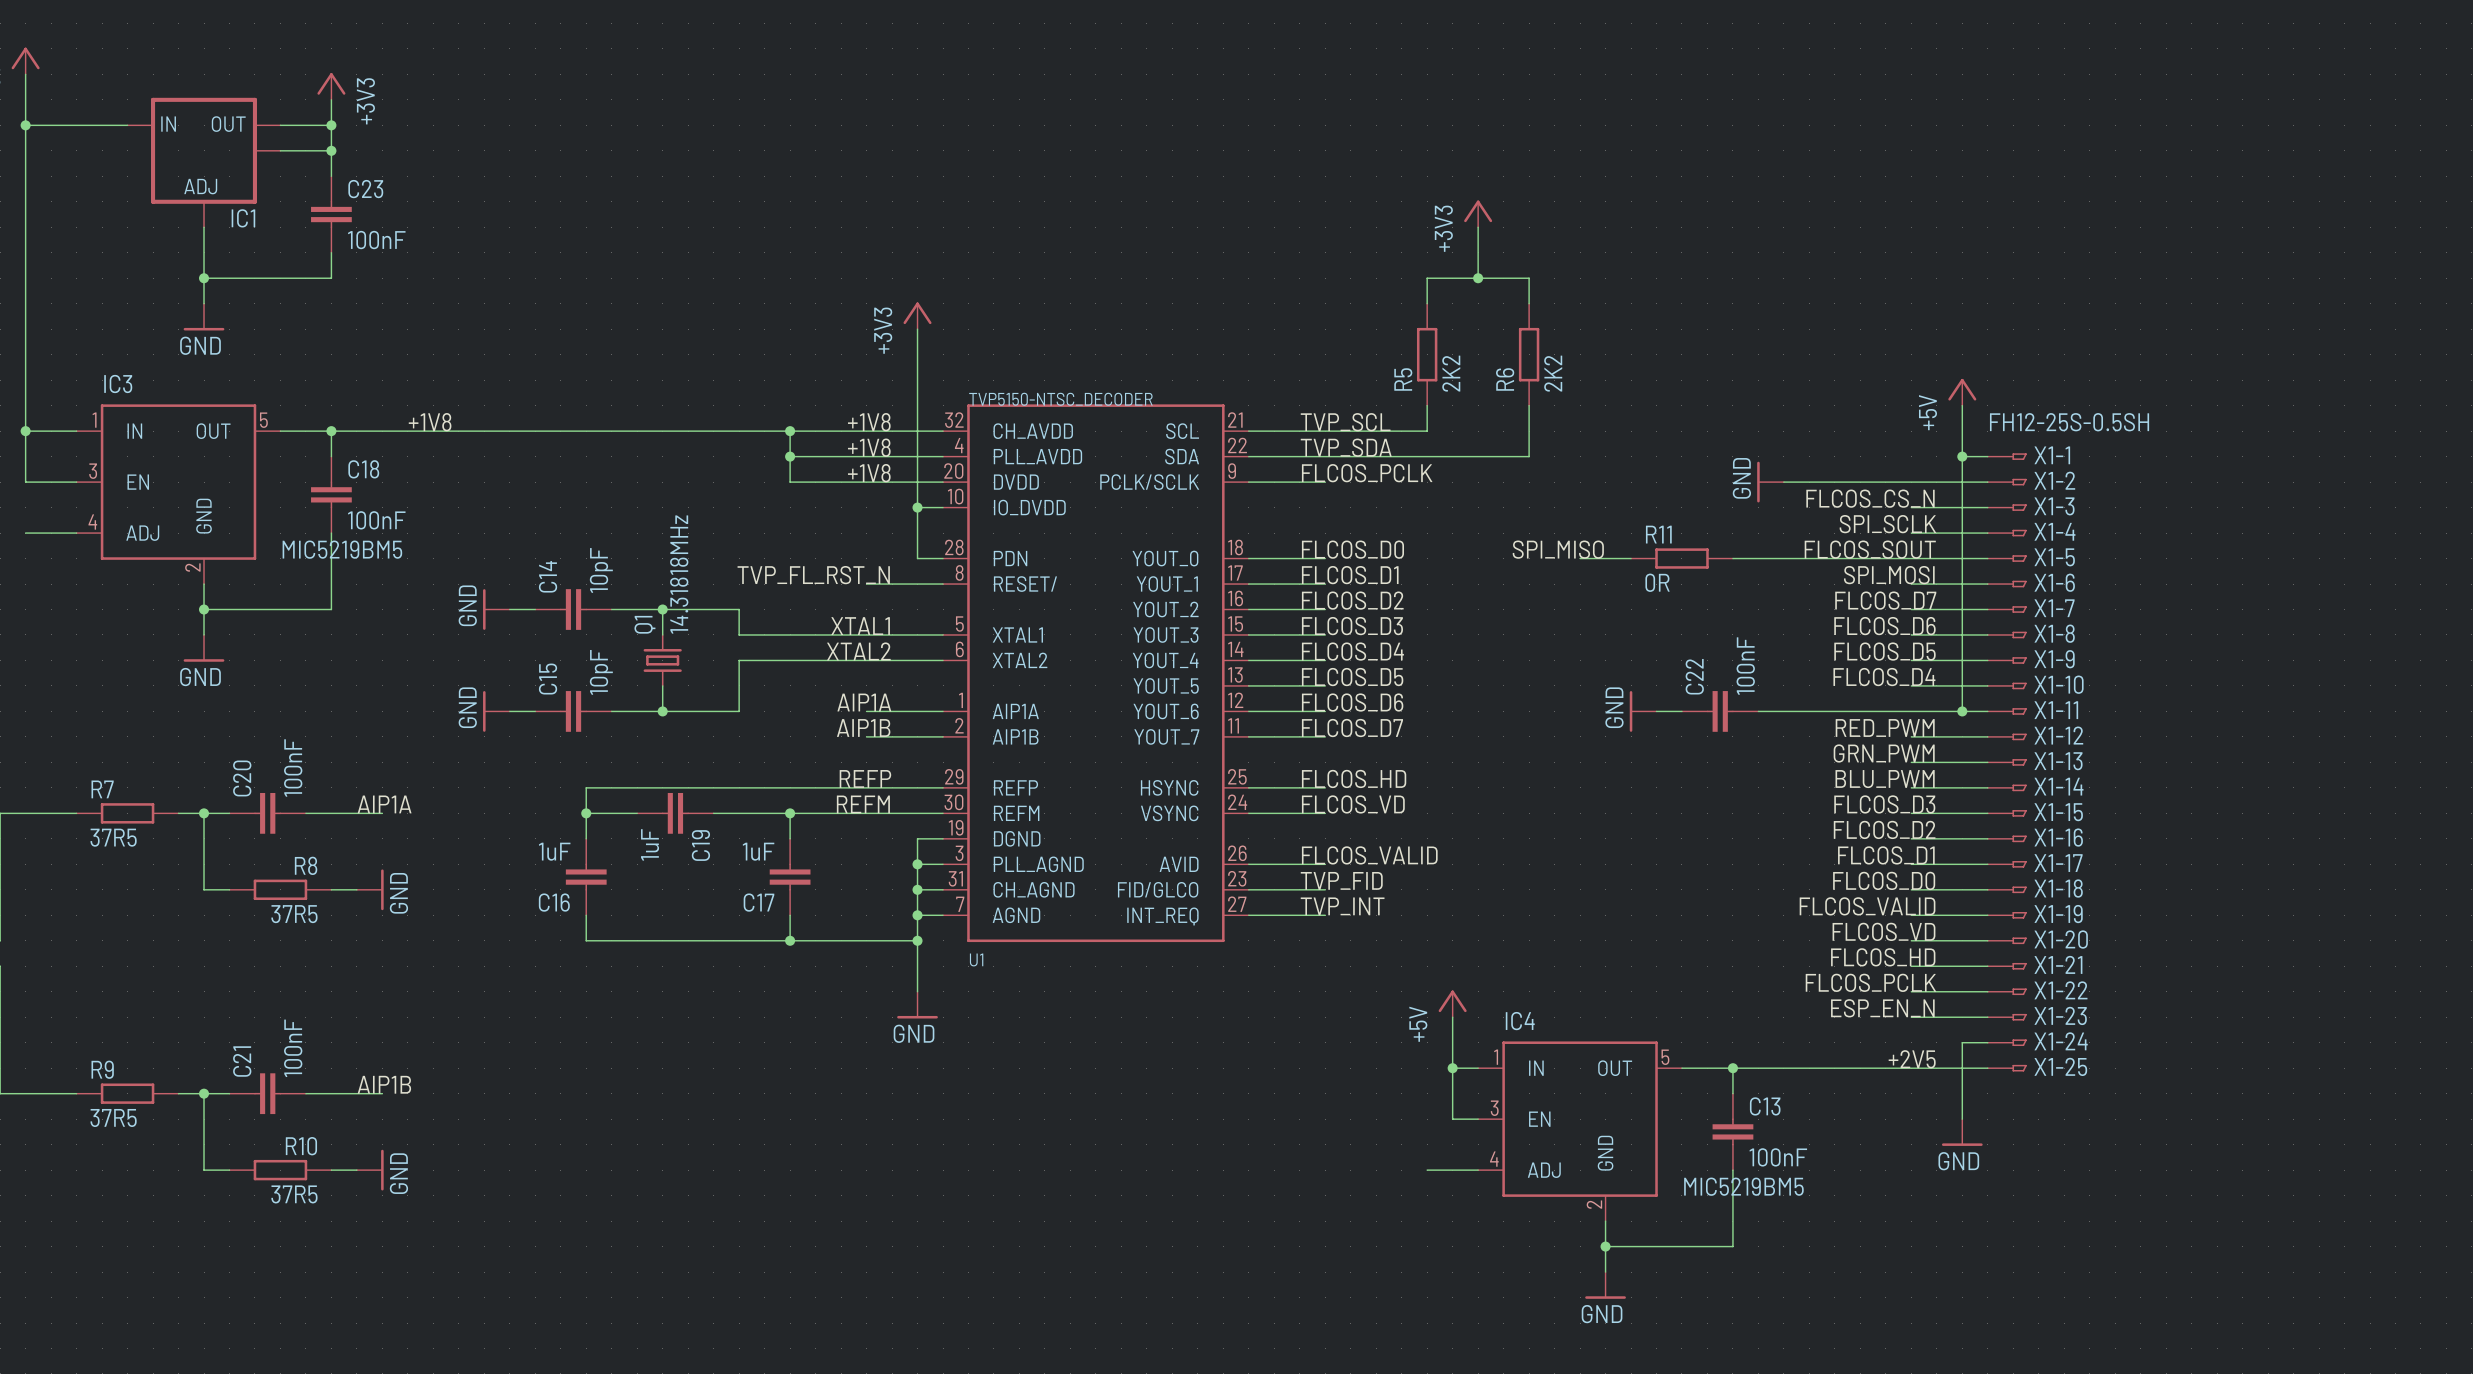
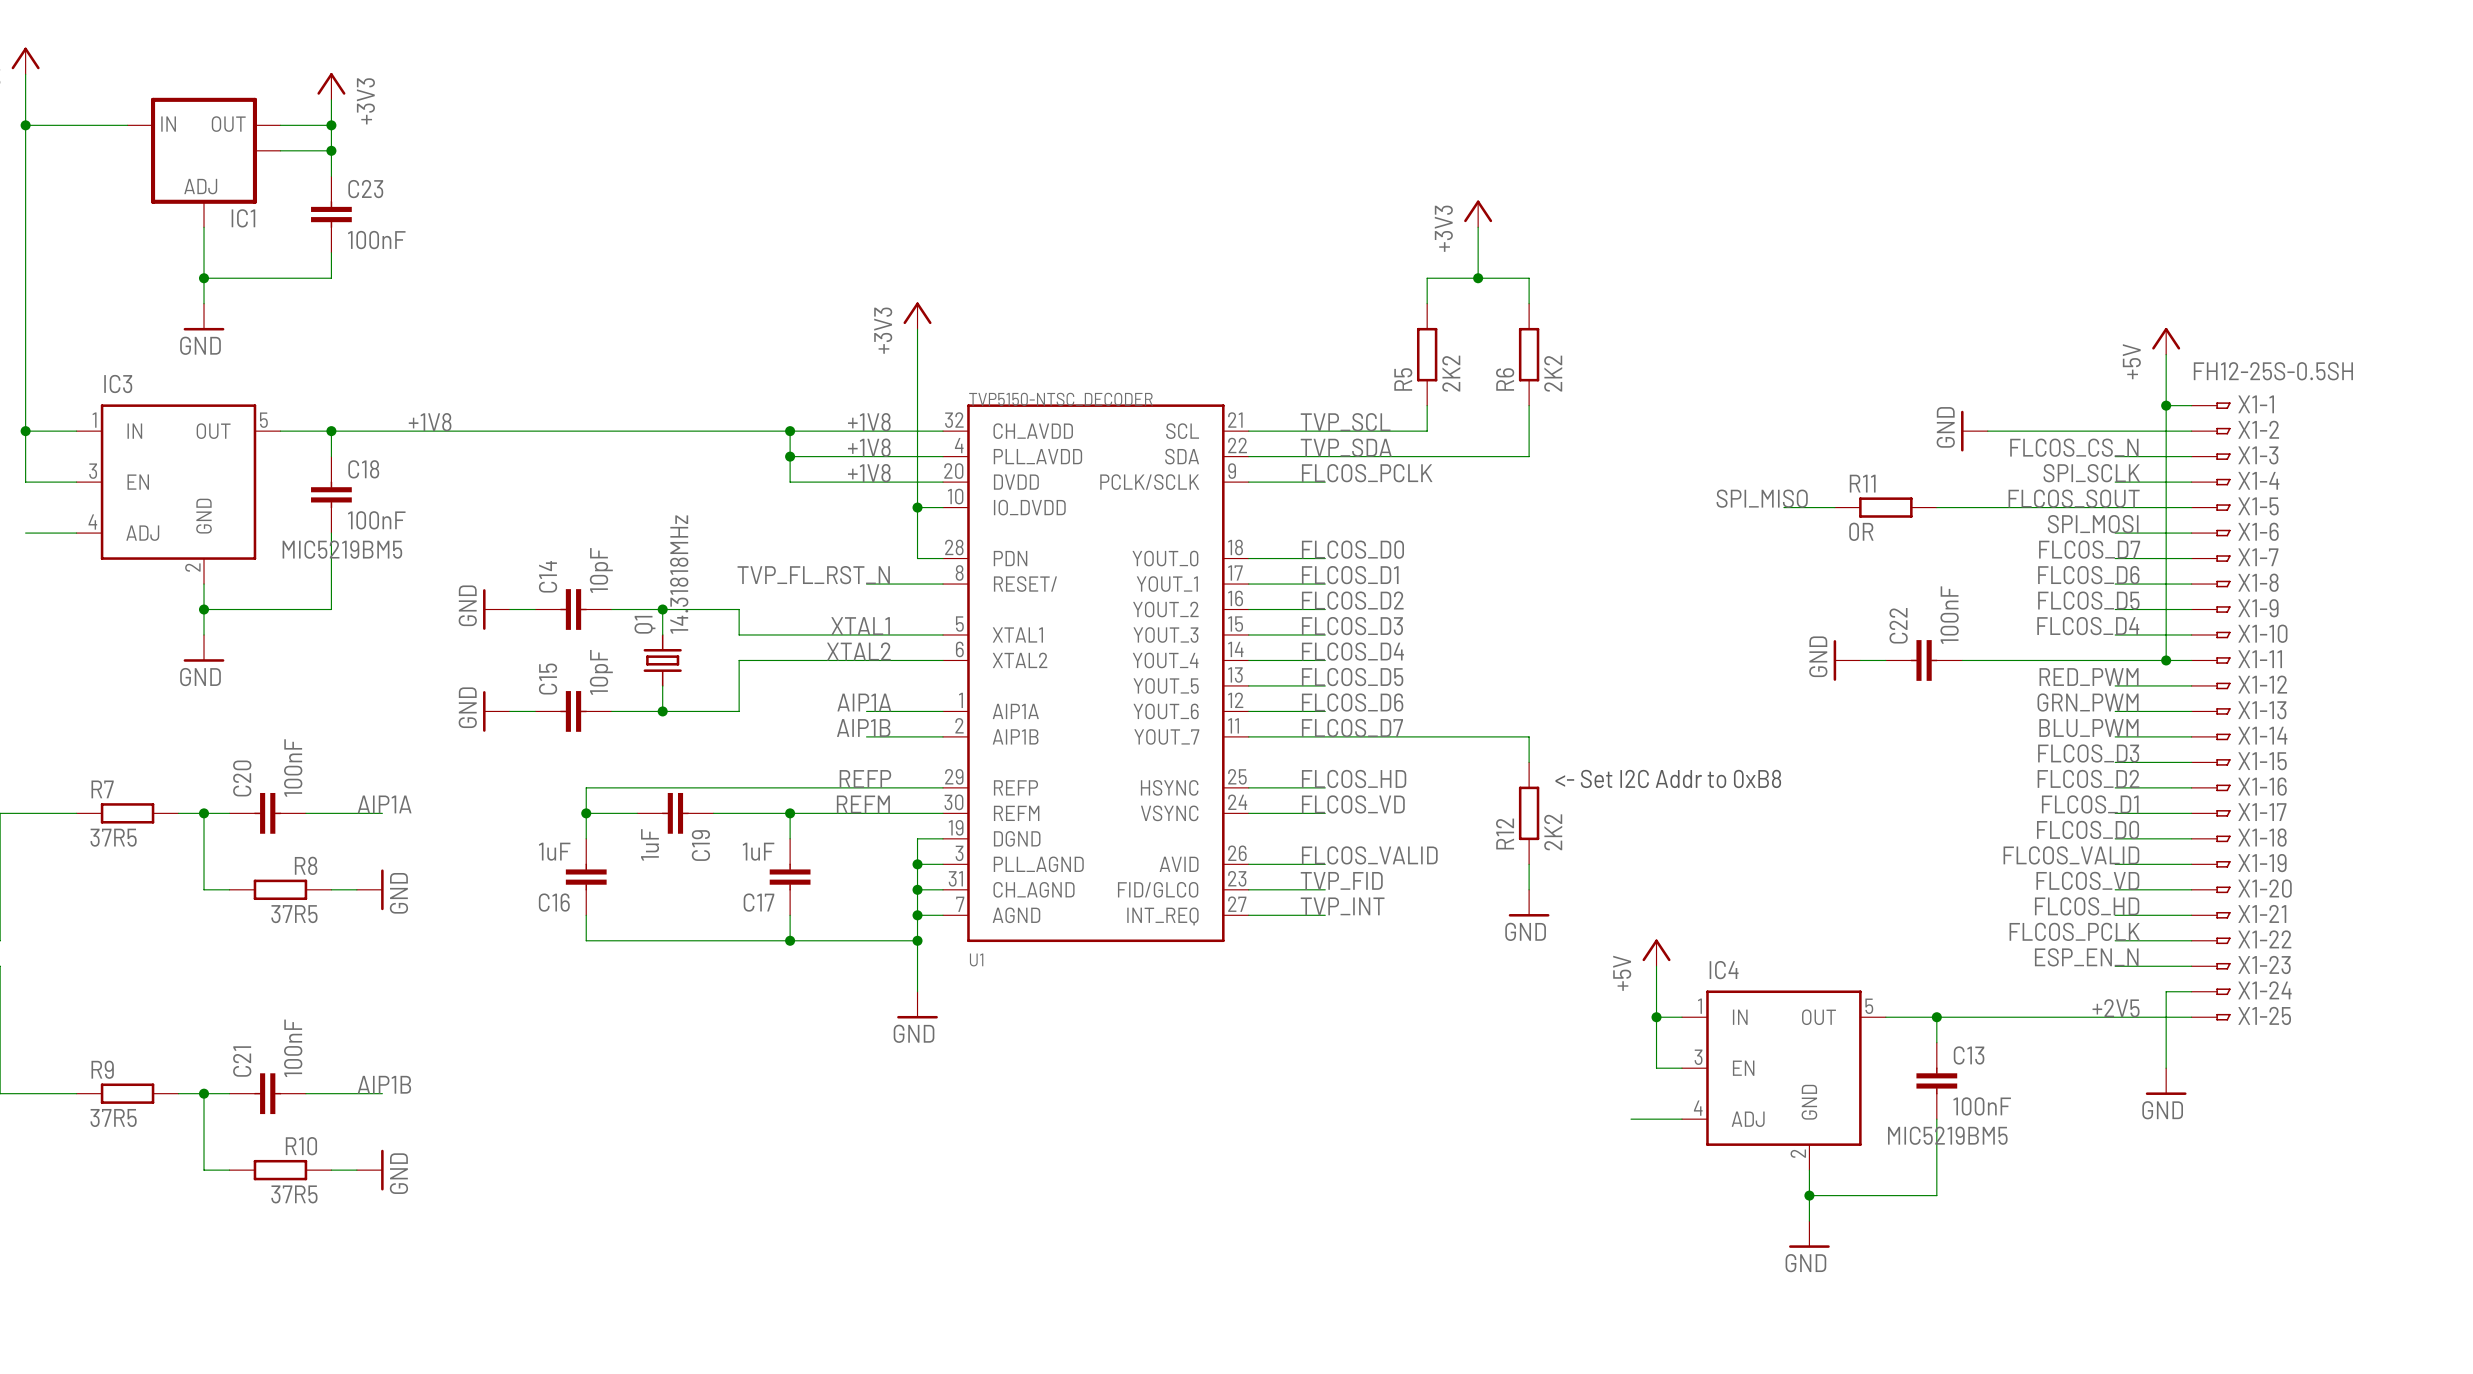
power symbol position: +5V (1962, 392) -> +5V (2166, 341)
wire: (1962, 405) (1962, 711) -> (2166, 354) (2166, 660)
junction: none -> (2166, 405)
power symbol: none -> GND (1974, 431)
wire: (1962, 456) (1987, 456) -> (2166, 405) (2191, 405)
junction: (1962, 456) -> none
X1-1 position: (2007, 456) -> (2211, 405)
wire: none -> (2115, 456) (2191, 456)
power symbol: GND (1770, 482) -> none
wire: (1783, 482) (1987, 482) -> (1987, 431) (2191, 431)
X1-2 position: (2007, 482) -> (2211, 431)
label position: FLCOS_CS_N (1870, 498) -> FLCOS_CS_N (2074, 447)
wire: none -> (1987, 507) (2191, 507)
X1-3 position: (2007, 507) -> (2211, 456)
label position: SPI_SCLK (1887, 524) -> SPI_SCLK (2091, 473)
wire: (1911, 533) (1987, 533) -> (2115, 482) (2191, 482)
X1-4 position: (2007, 533) -> (2211, 482)
label position: SPI_MISO (1558, 549) -> SPI_MISO (1762, 498)
label position: FLCOS_SOUT (1870, 549) -> FLCOS_SOUT (2074, 498)
wire: (1580, 558) (1631, 558) -> (1783, 507) (1834, 507)
R11 position: (1681, 558) -> (1885, 507)
wire: (1732, 558) (1987, 558) -> none
X1-5 position: (2007, 558) -> (2211, 507)
label position: SPI_MOSI (1889, 575) -> SPI_MOSI (2093, 524)
wire: (1911, 584) (1987, 584) -> (2115, 533) (2191, 533)
X1-6 position: (2007, 584) -> (2211, 533)
label position: FLCOS_D7 (1885, 600) -> FLCOS_D7 (2089, 549)
wire: (1911, 609) (1987, 609) -> (2115, 558) (2191, 558)
X1-7 position: (2007, 609) -> (2211, 558)
wire: none -> (2115, 609) (2191, 609)
label position: FLCOS_D6 (1884, 626) -> FLCOS_D6 (2088, 575)
wire: (1911, 634) (1987, 634) -> (2115, 584) (2191, 584)
X1-8 position: (2007, 634) -> (2211, 584)
label position: FLCOS_D5 (1884, 651) -> FLCOS_D5 (2088, 600)
power symbol: none -> GND (1846, 660)
wire: none -> (1987, 660) (2191, 660)
X1-9 position: (2007, 660) -> (2211, 609)
junction: none -> (2166, 660)
label position: FLCOS_D4 (1884, 677) -> FLCOS_D4 (2088, 626)
wire: (1911, 685) (1987, 685) -> (2115, 634) (2191, 634)
X1-10 position: (2007, 685) -> (2211, 634)
power symbol: GND (1643, 711) -> none
wire: (1656, 711) (1681, 711) -> (1860, 660) (1885, 660)
C22 position: (1720, 711) -> (1924, 660)
wire: (1758, 711) (1987, 711) -> none
junction: (1962, 711) -> none
X1-11 position: (2007, 711) -> (2211, 660)
label position: RED_PWM (1885, 727) -> RED_PWM (2089, 677)
wire: none -> (1325, 736) (1529, 736) (1529, 762)
wire: (1911, 736) (1987, 736) -> (2115, 685) (2191, 685)
X1-12 position: (2007, 736) -> (2211, 685)
label position: GRN_PWM (1884, 753) -> GRN_PWM (2088, 702)
wire: (1911, 762) (1987, 762) -> (2115, 711) (2191, 711)
X1-13 position: (2007, 762) -> (2211, 711)
text: none -> <- Set I2C Addr to 0xB8 (1668, 778)
label position: BLU_PWM (1885, 779) -> BLU_PWM (2088, 728)
wire: (1911, 787) (1987, 787) -> (2115, 736) (2191, 736)
X1-14 position: (2007, 787) -> (2211, 736)
label position: FLCOS_D3 (1884, 804) -> FLCOS_D3 (2088, 753)
R12: none -> 2K2 (1529, 813)
wire: (1911, 813) (1987, 813) -> (2115, 762) (2191, 762)
X1-15 position: (2007, 813) -> (2211, 762)
label position: FLCOS_D2 (1884, 829) -> FLCOS_D2 (2088, 778)
wire: (1911, 838) (1987, 838) -> (2115, 787) (2191, 787)
X1-16 position: (2007, 838) -> (2211, 787)
label position: FLCOS_D1 (1886, 855) -> FLCOS_D1 (2090, 804)
wire: none -> (1529, 864) (1529, 889)
wire: (1911, 864) (1987, 864) -> (2115, 813) (2191, 813)
X1-17 position: (2007, 864) -> (2211, 813)
label position: FLCOS_D0 (1884, 880) -> FLCOS_D0 (2088, 829)
wire: (1911, 889) (1987, 889) -> (2115, 838) (2191, 838)
X1-18 position: (2007, 889) -> (2211, 838)
power symbol: none -> GND (1529, 903)
label position: FLCOS_VALID (1867, 906) -> FLCOS_VALID (2071, 855)
wire: (1911, 915) (1987, 915) -> (2115, 864) (2191, 864)
X1-19 position: (2007, 915) -> (2211, 864)
label position: FLCOS_VD (1883, 931) -> FLCOS_VD (2087, 880)
wire: (1911, 940) (1987, 940) -> (2115, 889) (2191, 889)
X1-20 position: (2007, 940) -> (2211, 889)
label position: FLCOS_HD (1883, 957) -> FLCOS_HD (2087, 906)
wire: (1911, 966) (1987, 966) -> (2115, 915) (2191, 915)
X1-21 position: (2007, 966) -> (2211, 915)
wire: none -> (2115, 966) (2191, 966)
label position: FLCOS_PCLK (1870, 982) -> FLCOS_PCLK (2074, 931)
wire: (1911, 991) (1987, 991) -> (2115, 940) (2191, 940)
X1-22 position: (2007, 991) -> (2211, 940)
power symbol position: +5V (1452, 1003) -> +5V (1656, 952)
label position: ESP_EN_N (1882, 1008) -> ESP_EN_N (2086, 957)
wire: (1452, 1017) (1452, 1119) (1478, 1119) -> none
junction: none -> (1656, 1017)
wire: none -> (1885, 1017) (1911, 1017)
junction: none -> (1936, 1017)
wire: none -> (1987, 1017) (2191, 1017)
X1-23 position: (2007, 1017) -> (2211, 966)
wire: (1987, 1042) (1962, 1042) (1962, 1119) -> (2191, 991) (2166, 991) (2166, 1068)
X1-24 position: (2007, 1042) -> (2211, 991)
label position: +2V5 (1912, 1059) -> +2V5 (2116, 1008)
wire: (1452, 1068) (1478, 1068) -> (1656, 1017) (1681, 1017)
junction: (1452, 1068) -> none
wire: (1681, 1068) (1987, 1068) -> (1681, 1068) (1656, 1068) (1656, 966)
wire: (1732, 1068) (1732, 1093) -> (1936, 1017) (1936, 1042)
junction: (1732, 1068) -> none
X1-25 position: (2007, 1068) -> (2211, 1017)
power symbol: none -> GND (2166, 1081)
IC4 position: (1580, 1131) -> (1783, 1080)
C13 position: (1732, 1131) -> (1936, 1080)
power symbol: GND (1962, 1132) -> none
wire: (1427, 1170) (1478, 1170) -> (1631, 1119) (1681, 1119)
wire: (1732, 1170) (1732, 1246) (1605, 1246) -> (1936, 1119) (1936, 1195) (1809, 1195)
junction: none -> (1809, 1195)
wire: (1605, 1221) (1605, 1272) -> (1809, 1170) (1809, 1221)
power symbol: none -> GND (1809, 1234)
junction: (1605, 1246) -> none
power symbol: GND (1605, 1285) -> none

